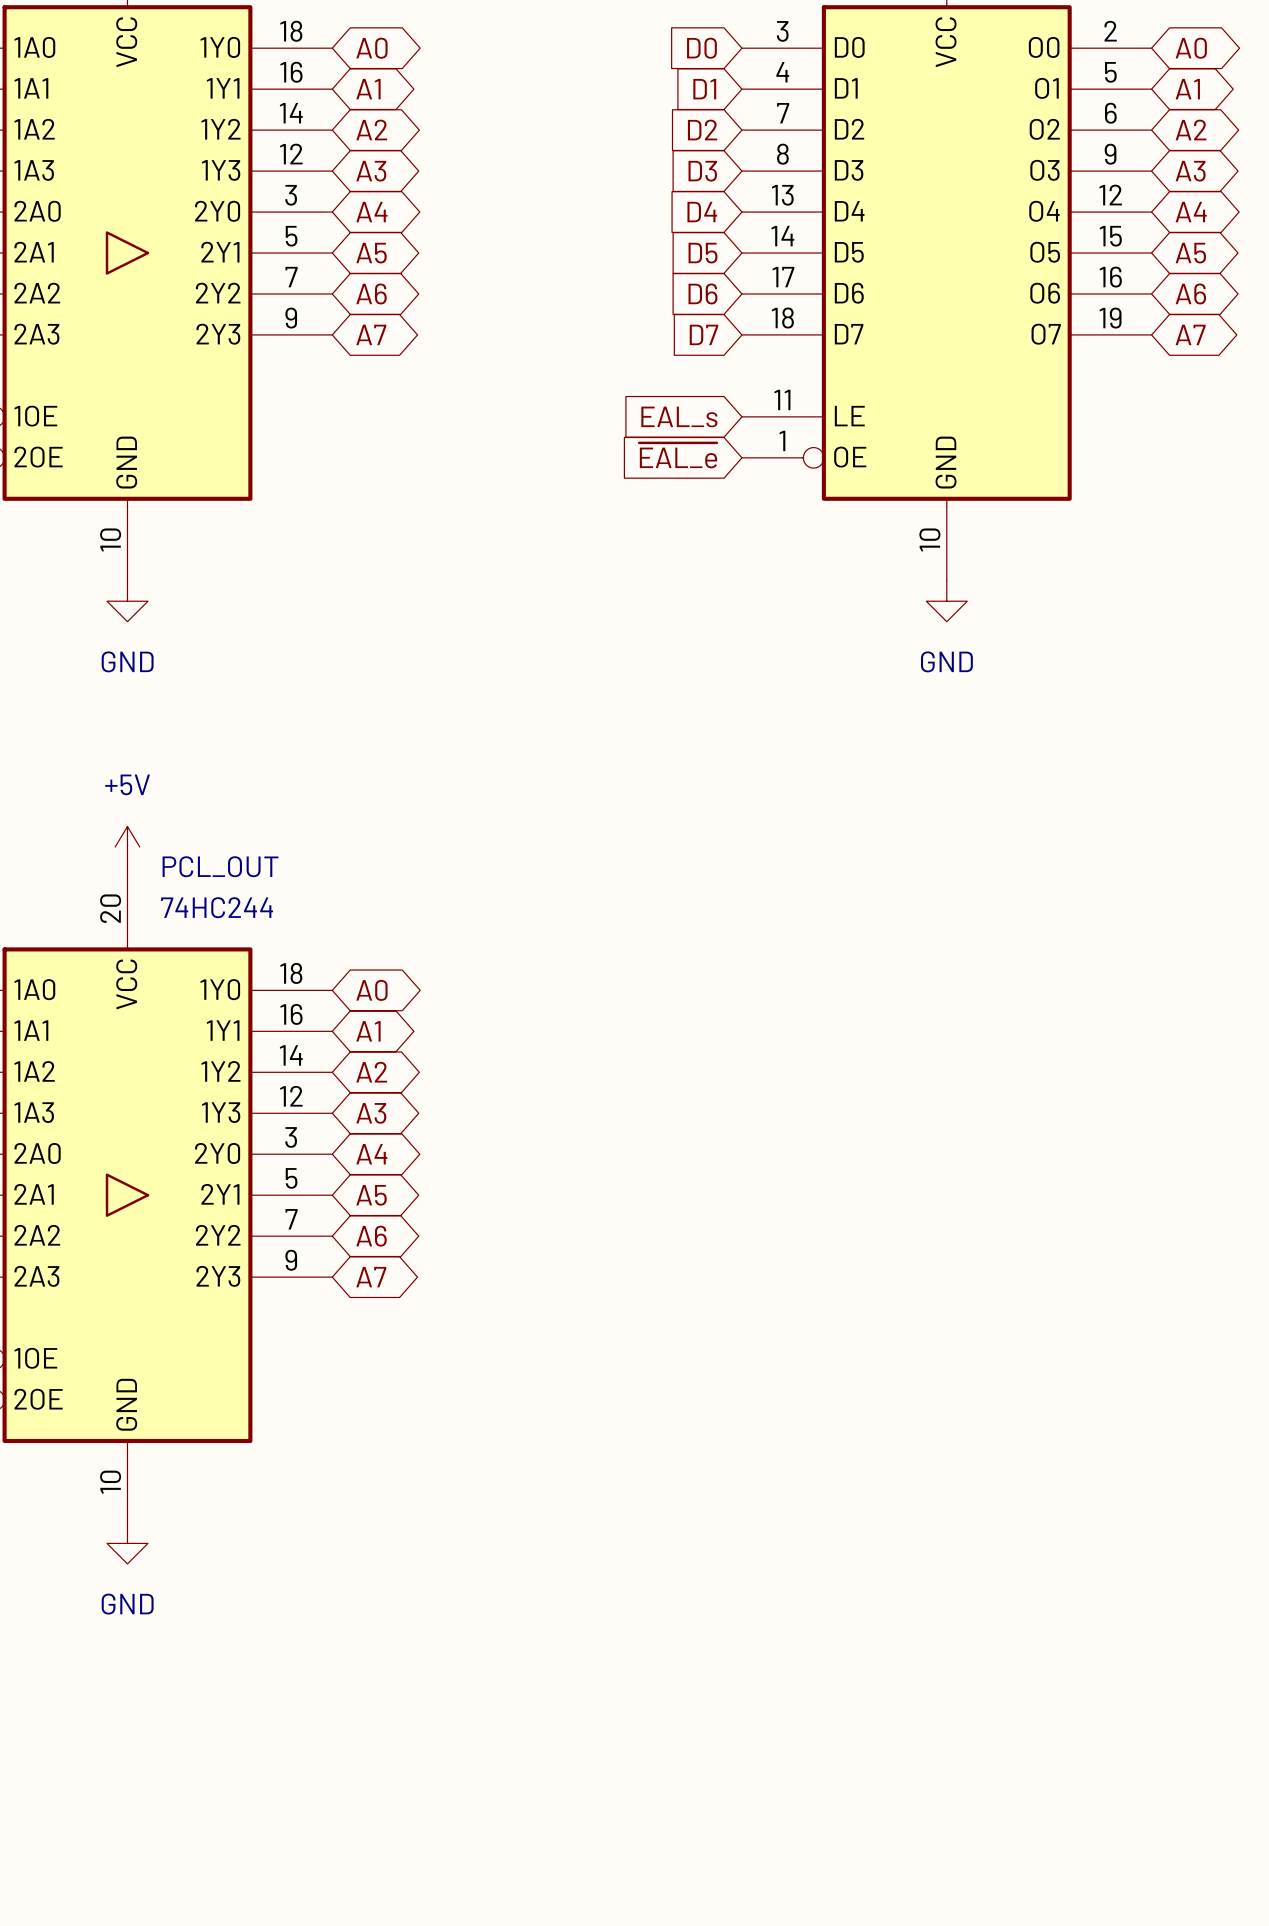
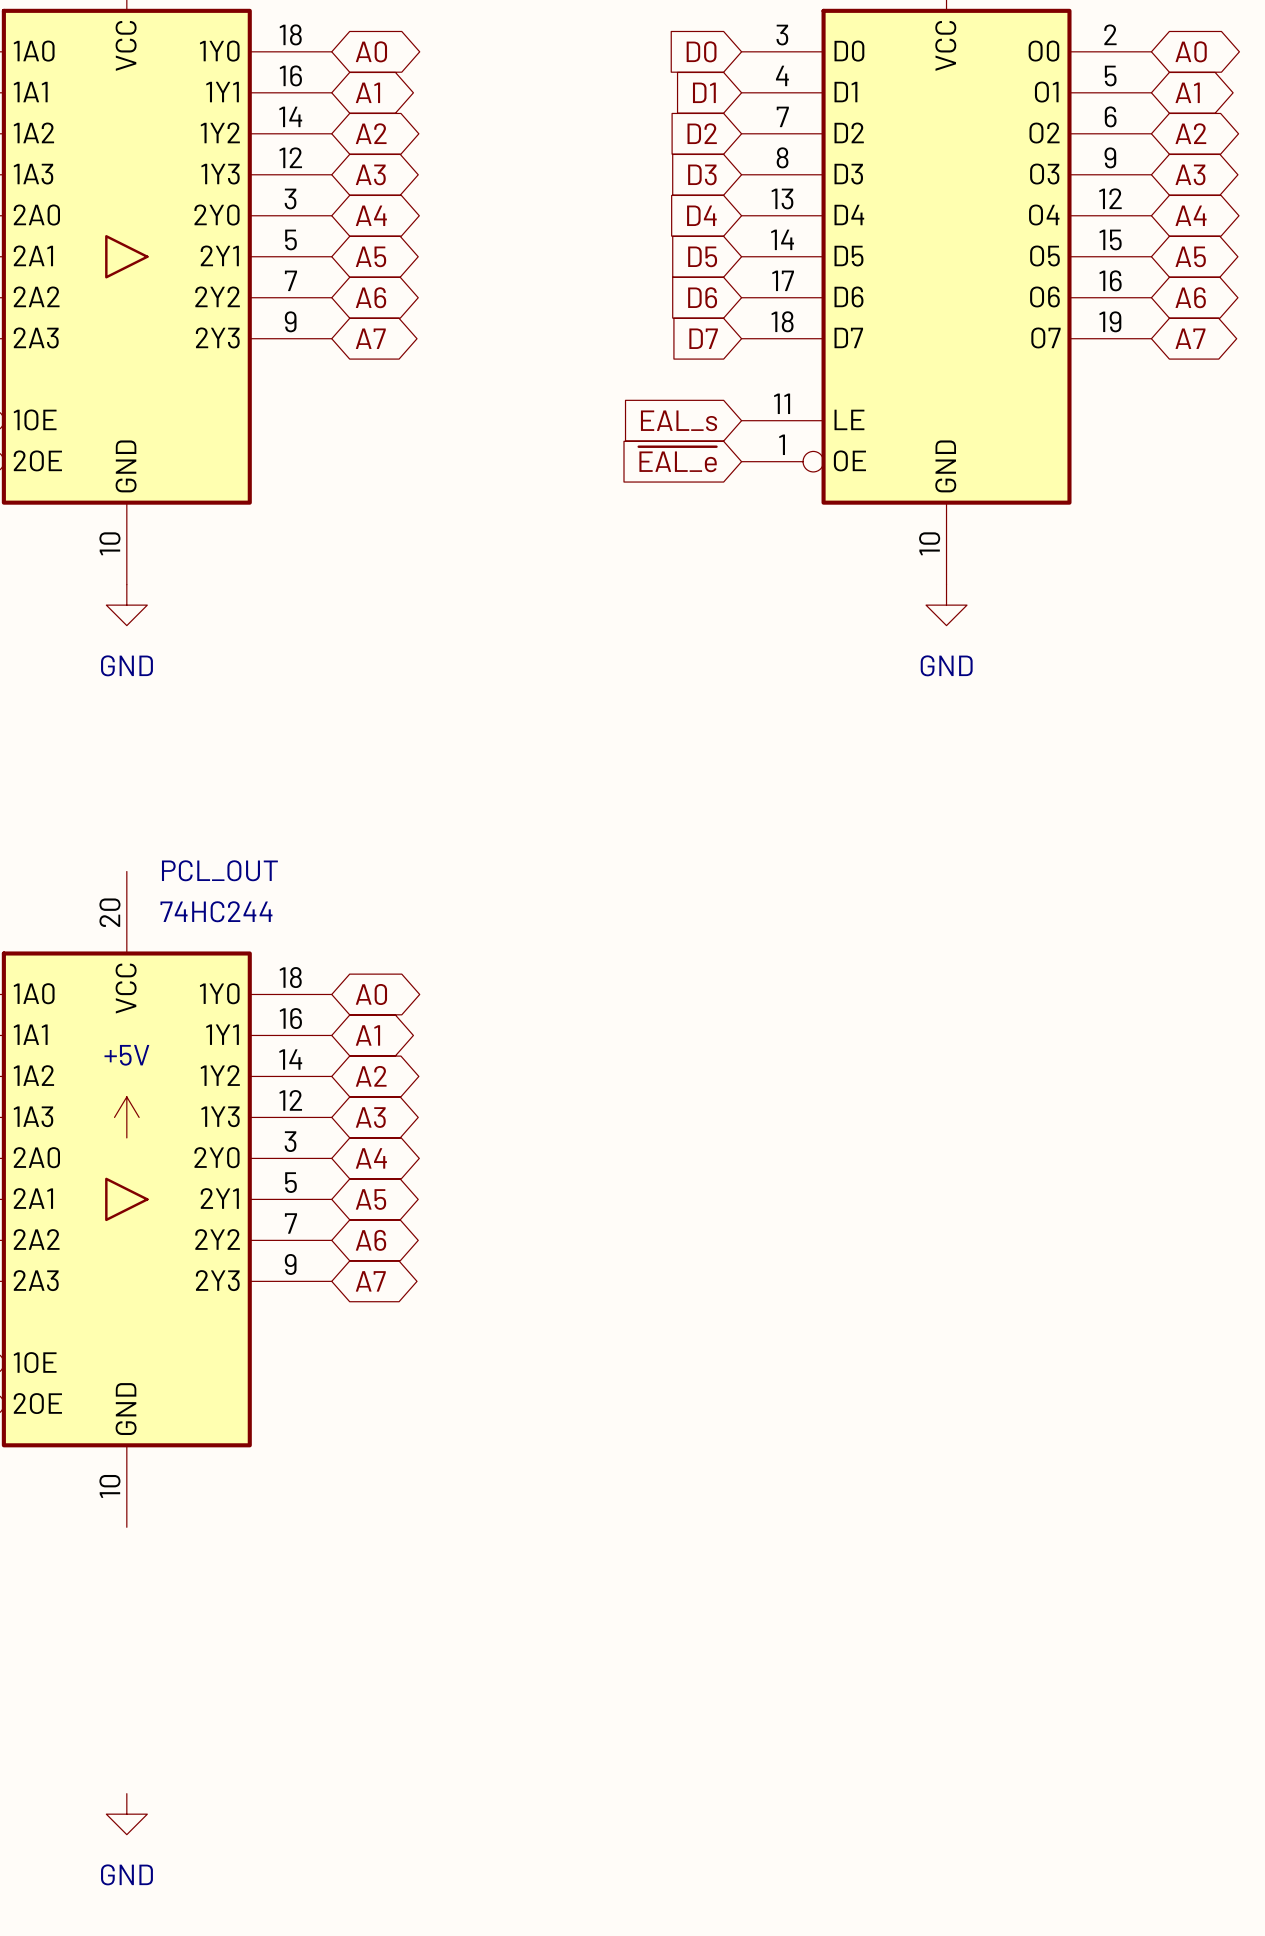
power symbol position: +5V (127, 847) -> +5V (126, 1117)
power symbol position: GND (127, 1543) -> GND (126, 1814)

